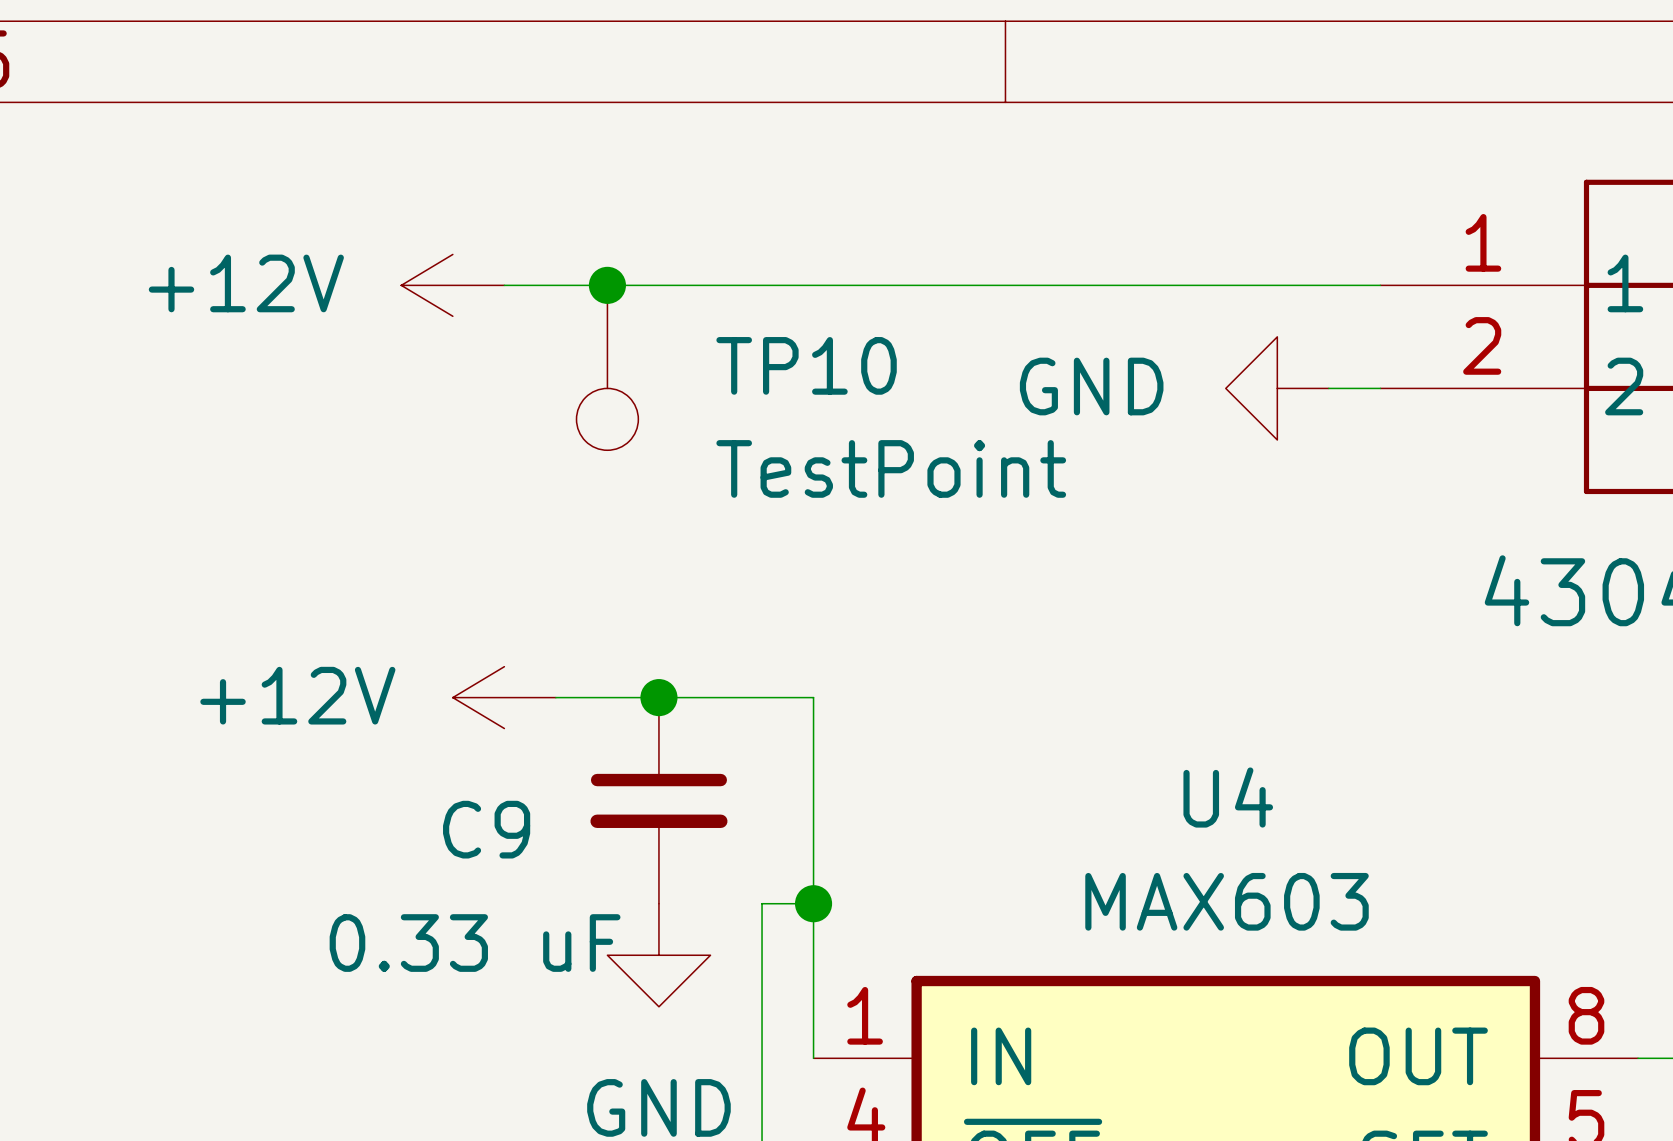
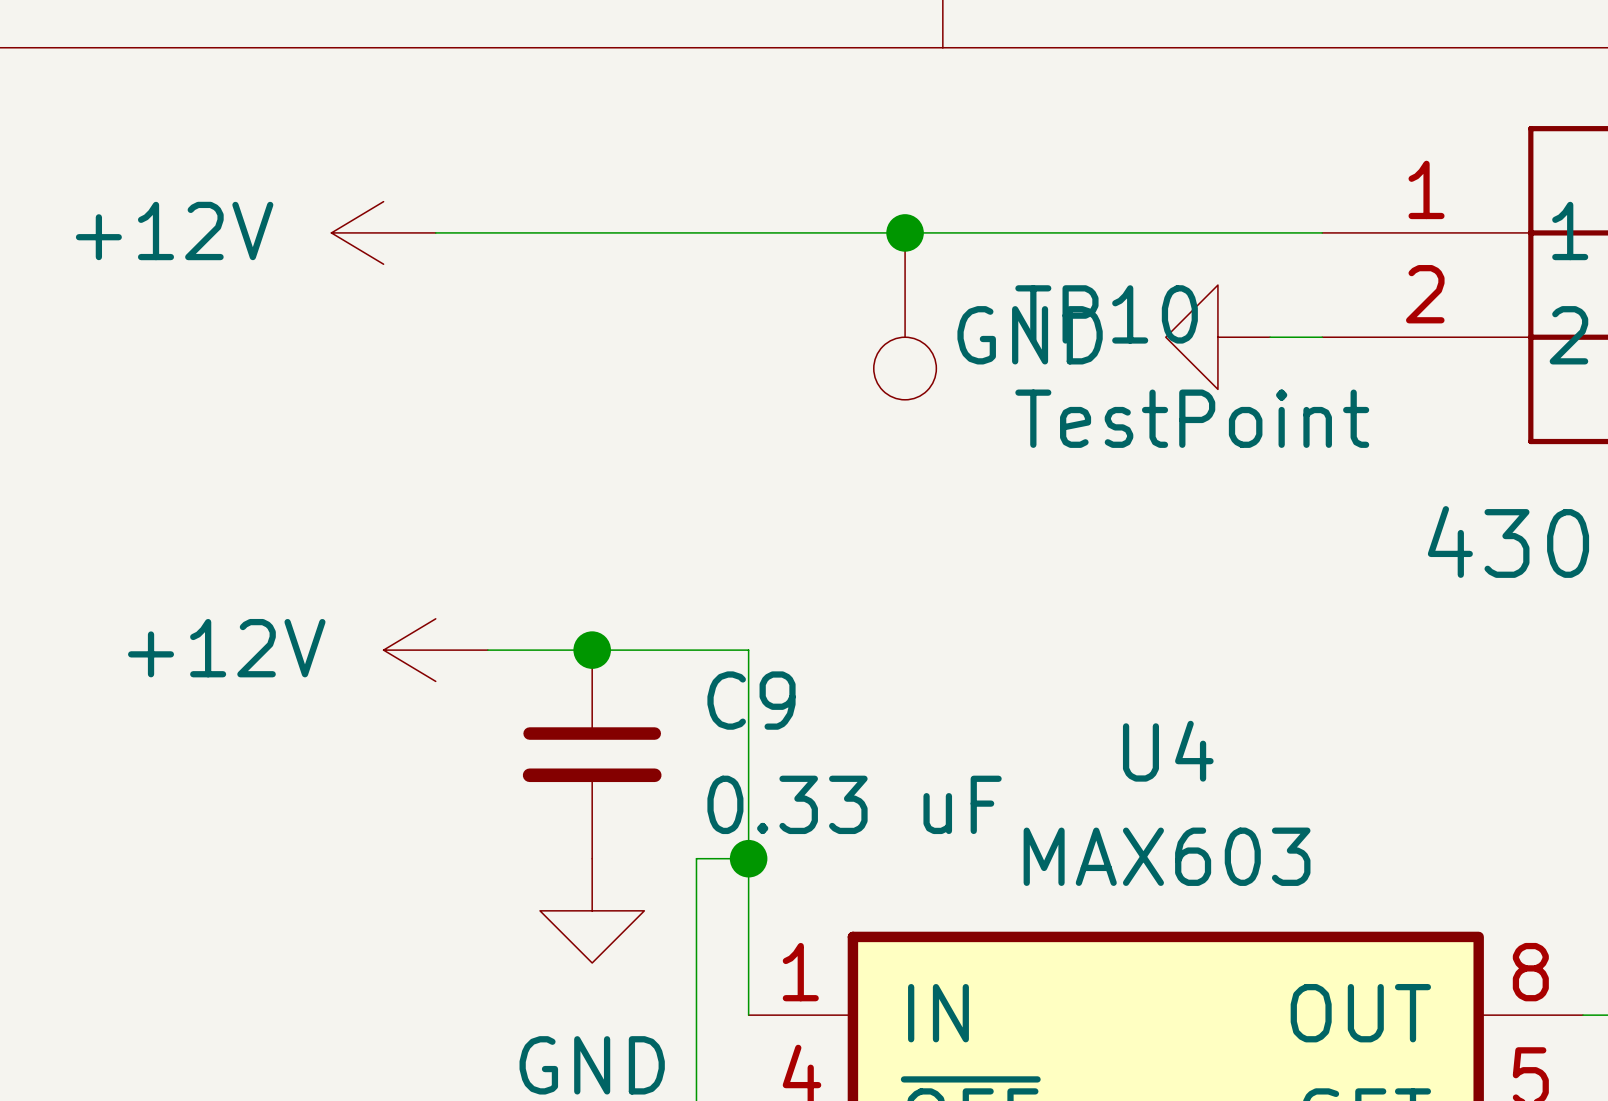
junction: (607, 285) -> none
junction: none -> (905, 232)
TP10 position: (607, 367) -> (905, 316)
C9 name position: C9 (486, 829) -> C9 (751, 700)
C9 value position: 0.33 uF (475, 943) -> 0.33 uF (854, 804)

